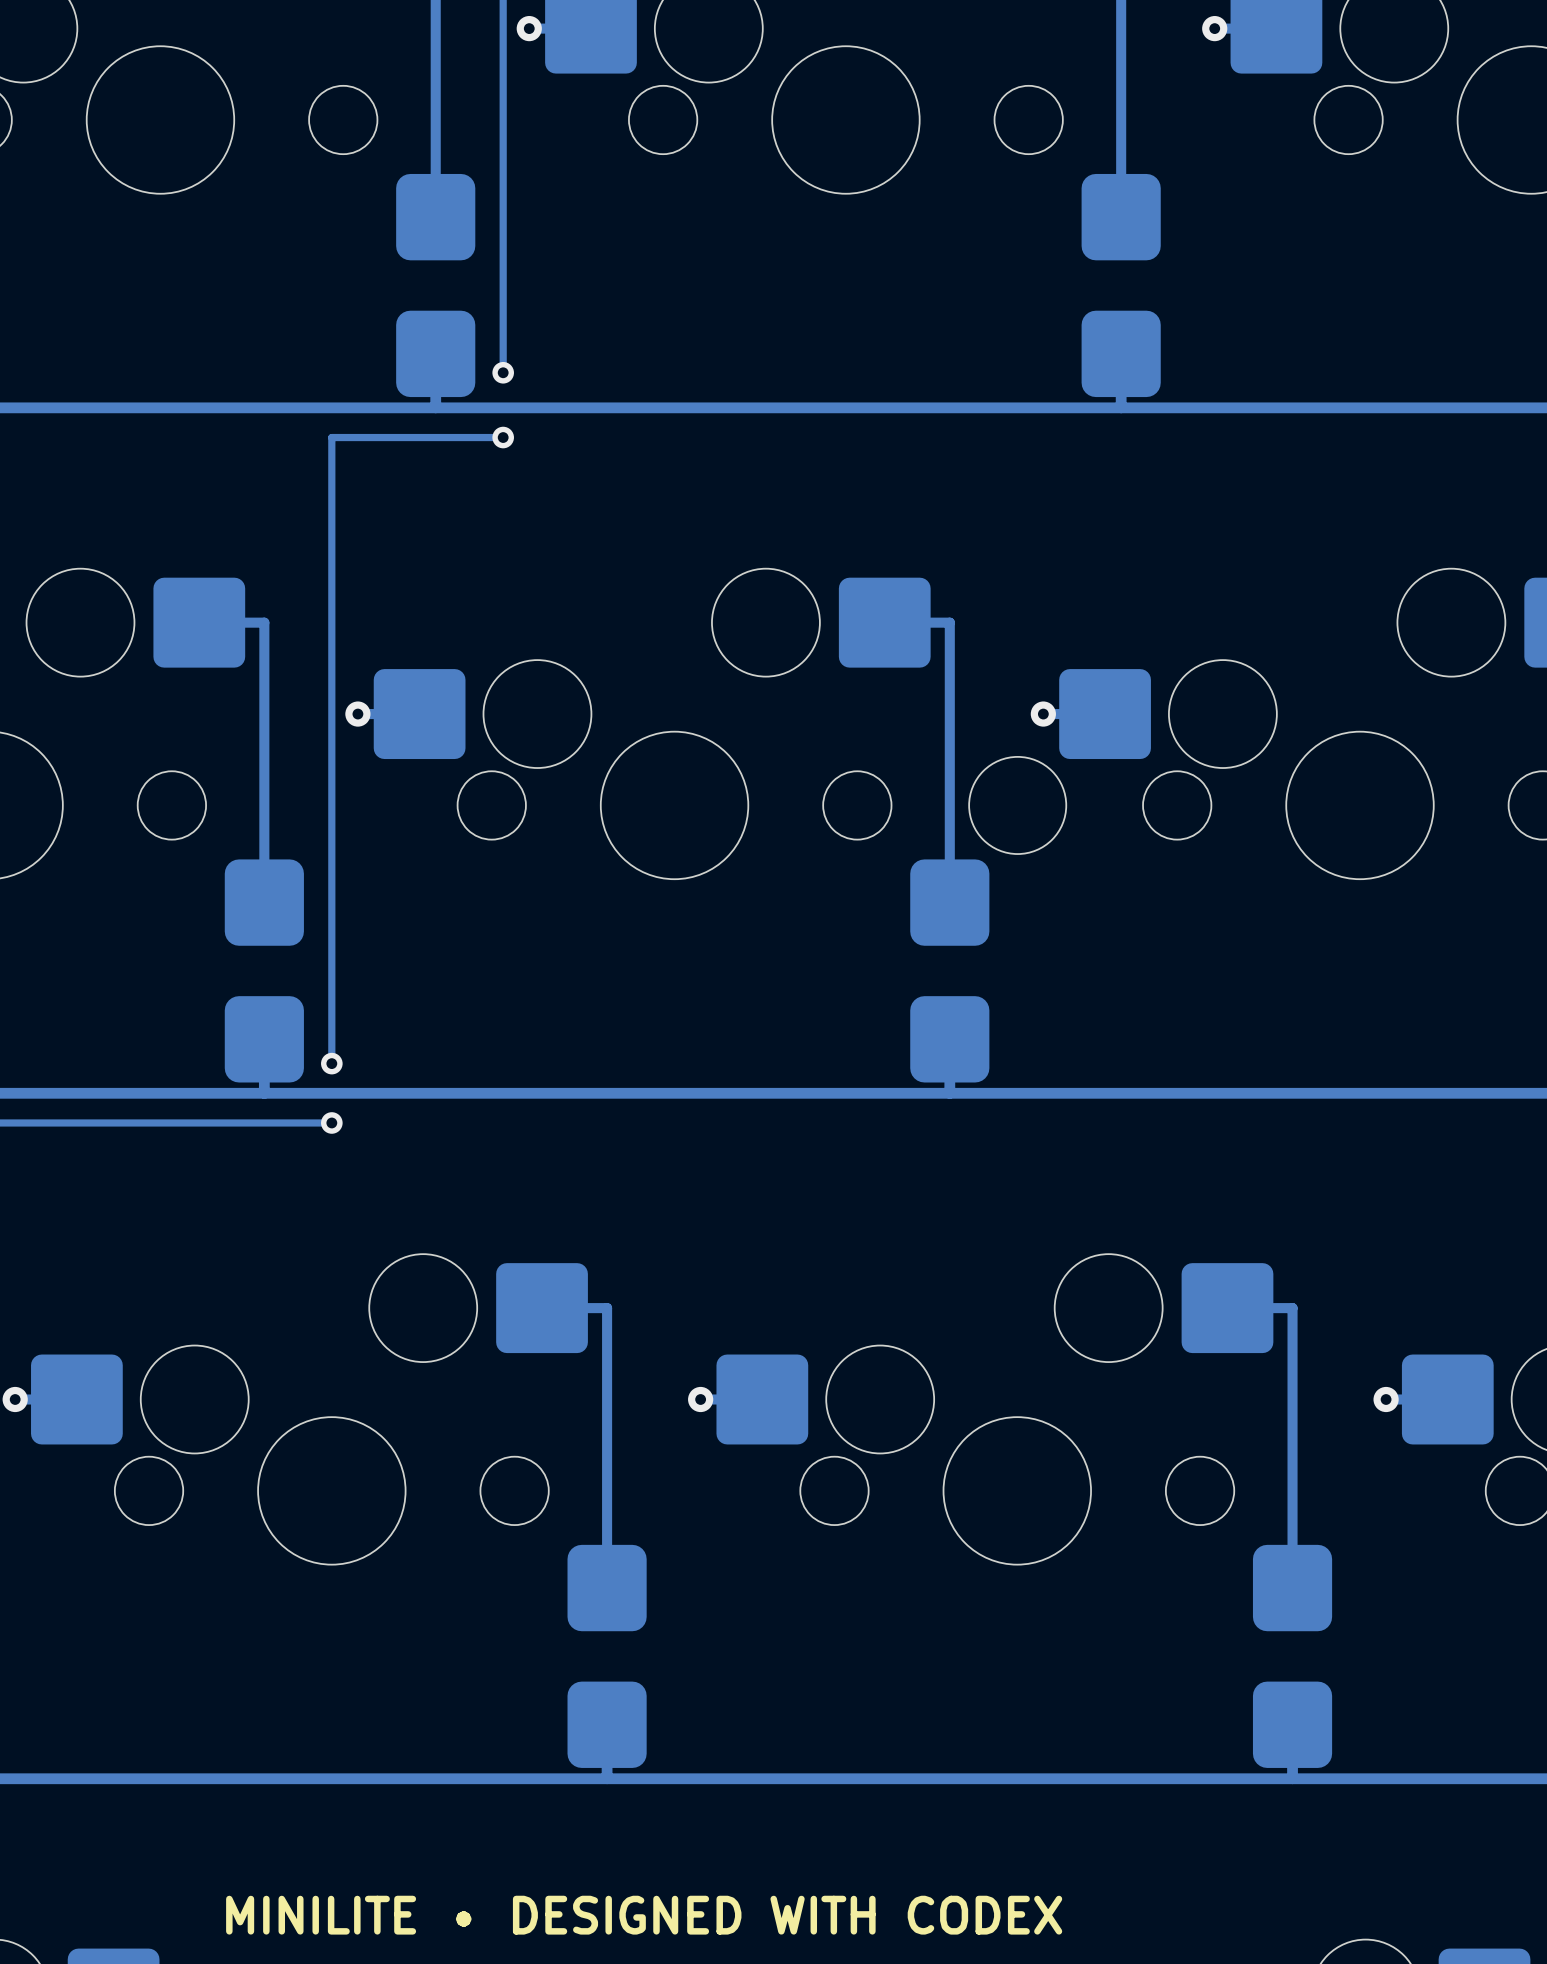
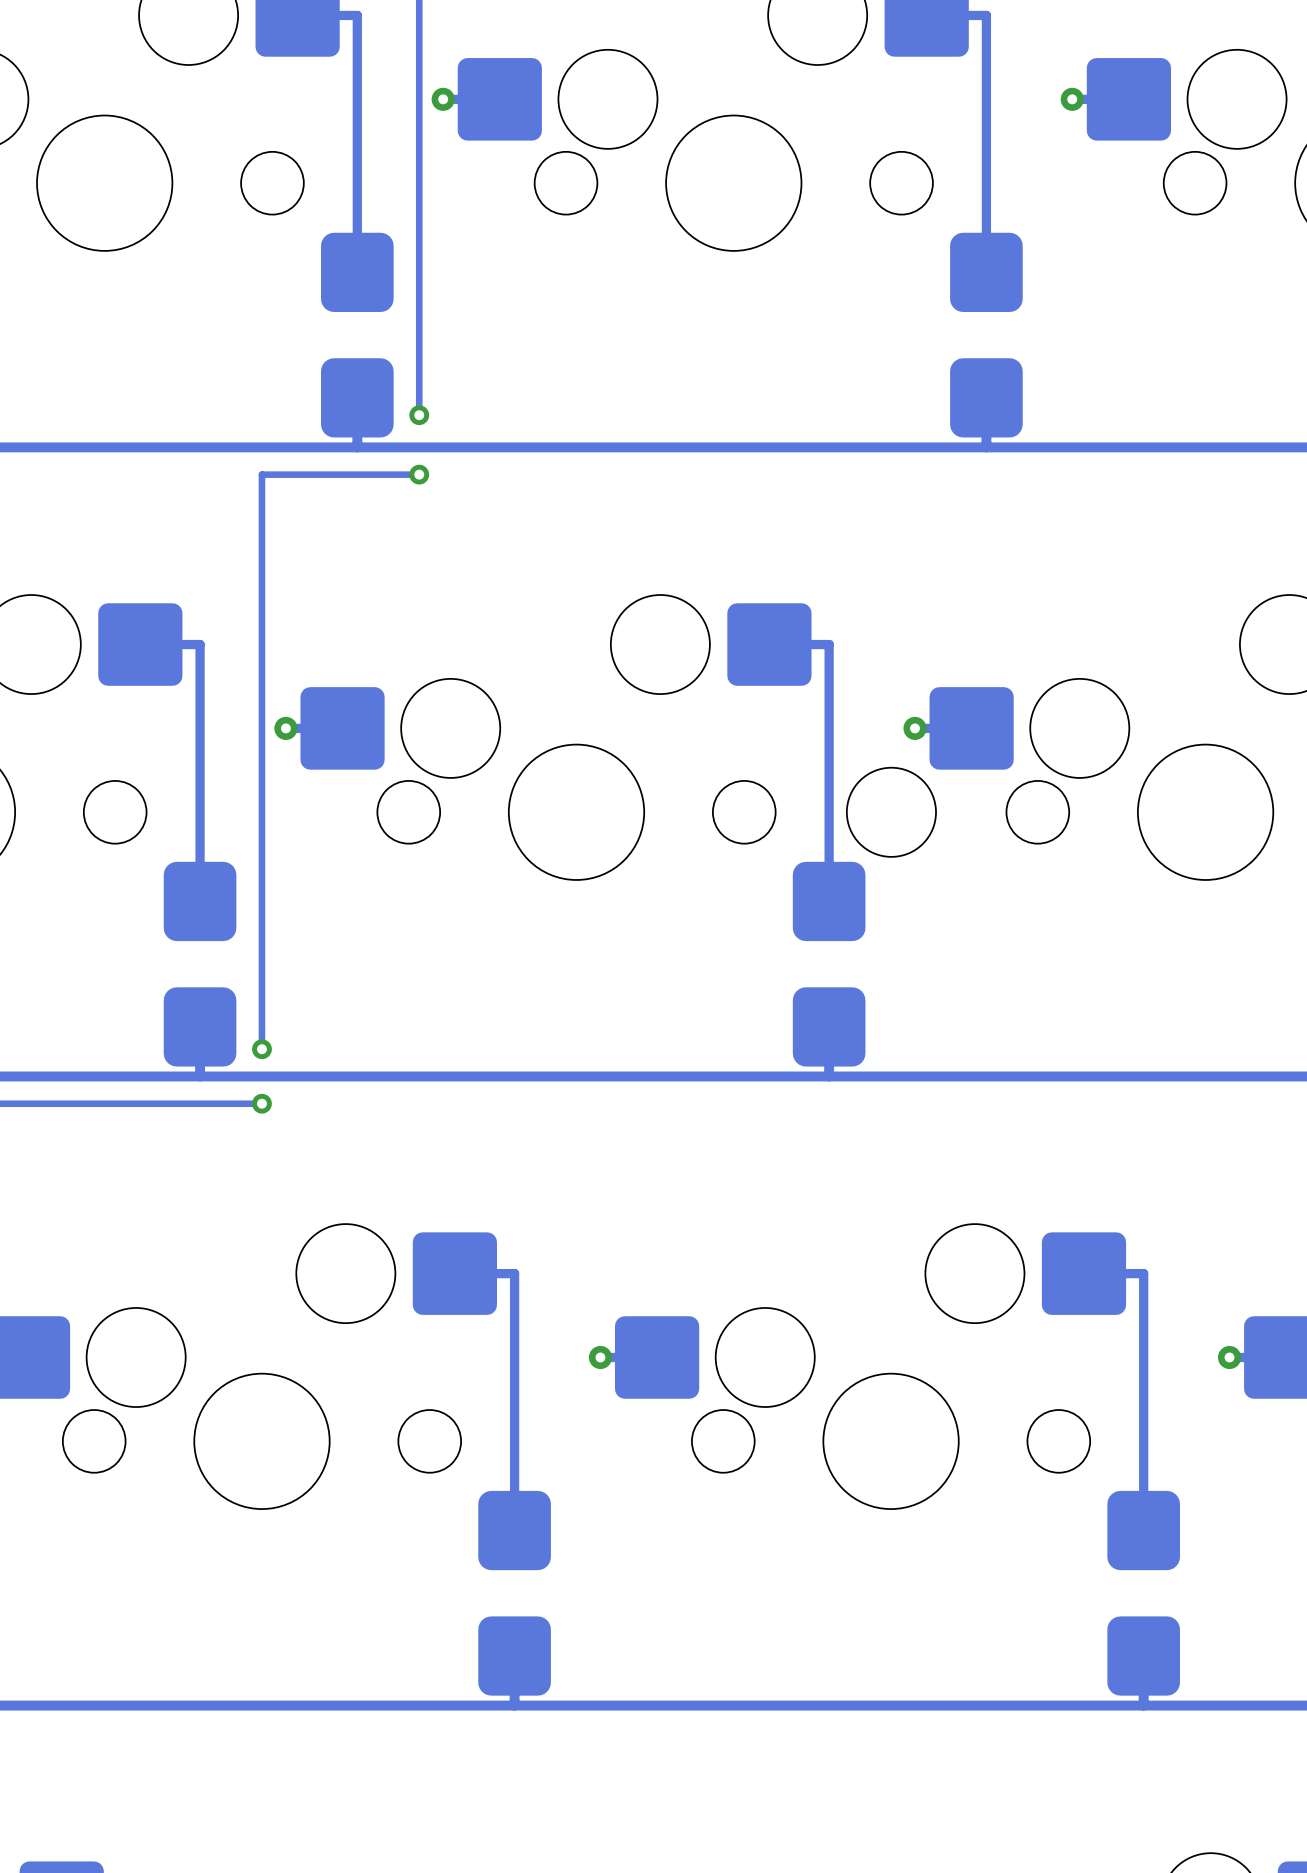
text: MINILITE • DESIGNED WITH CODEX (644, 1915) -> none

